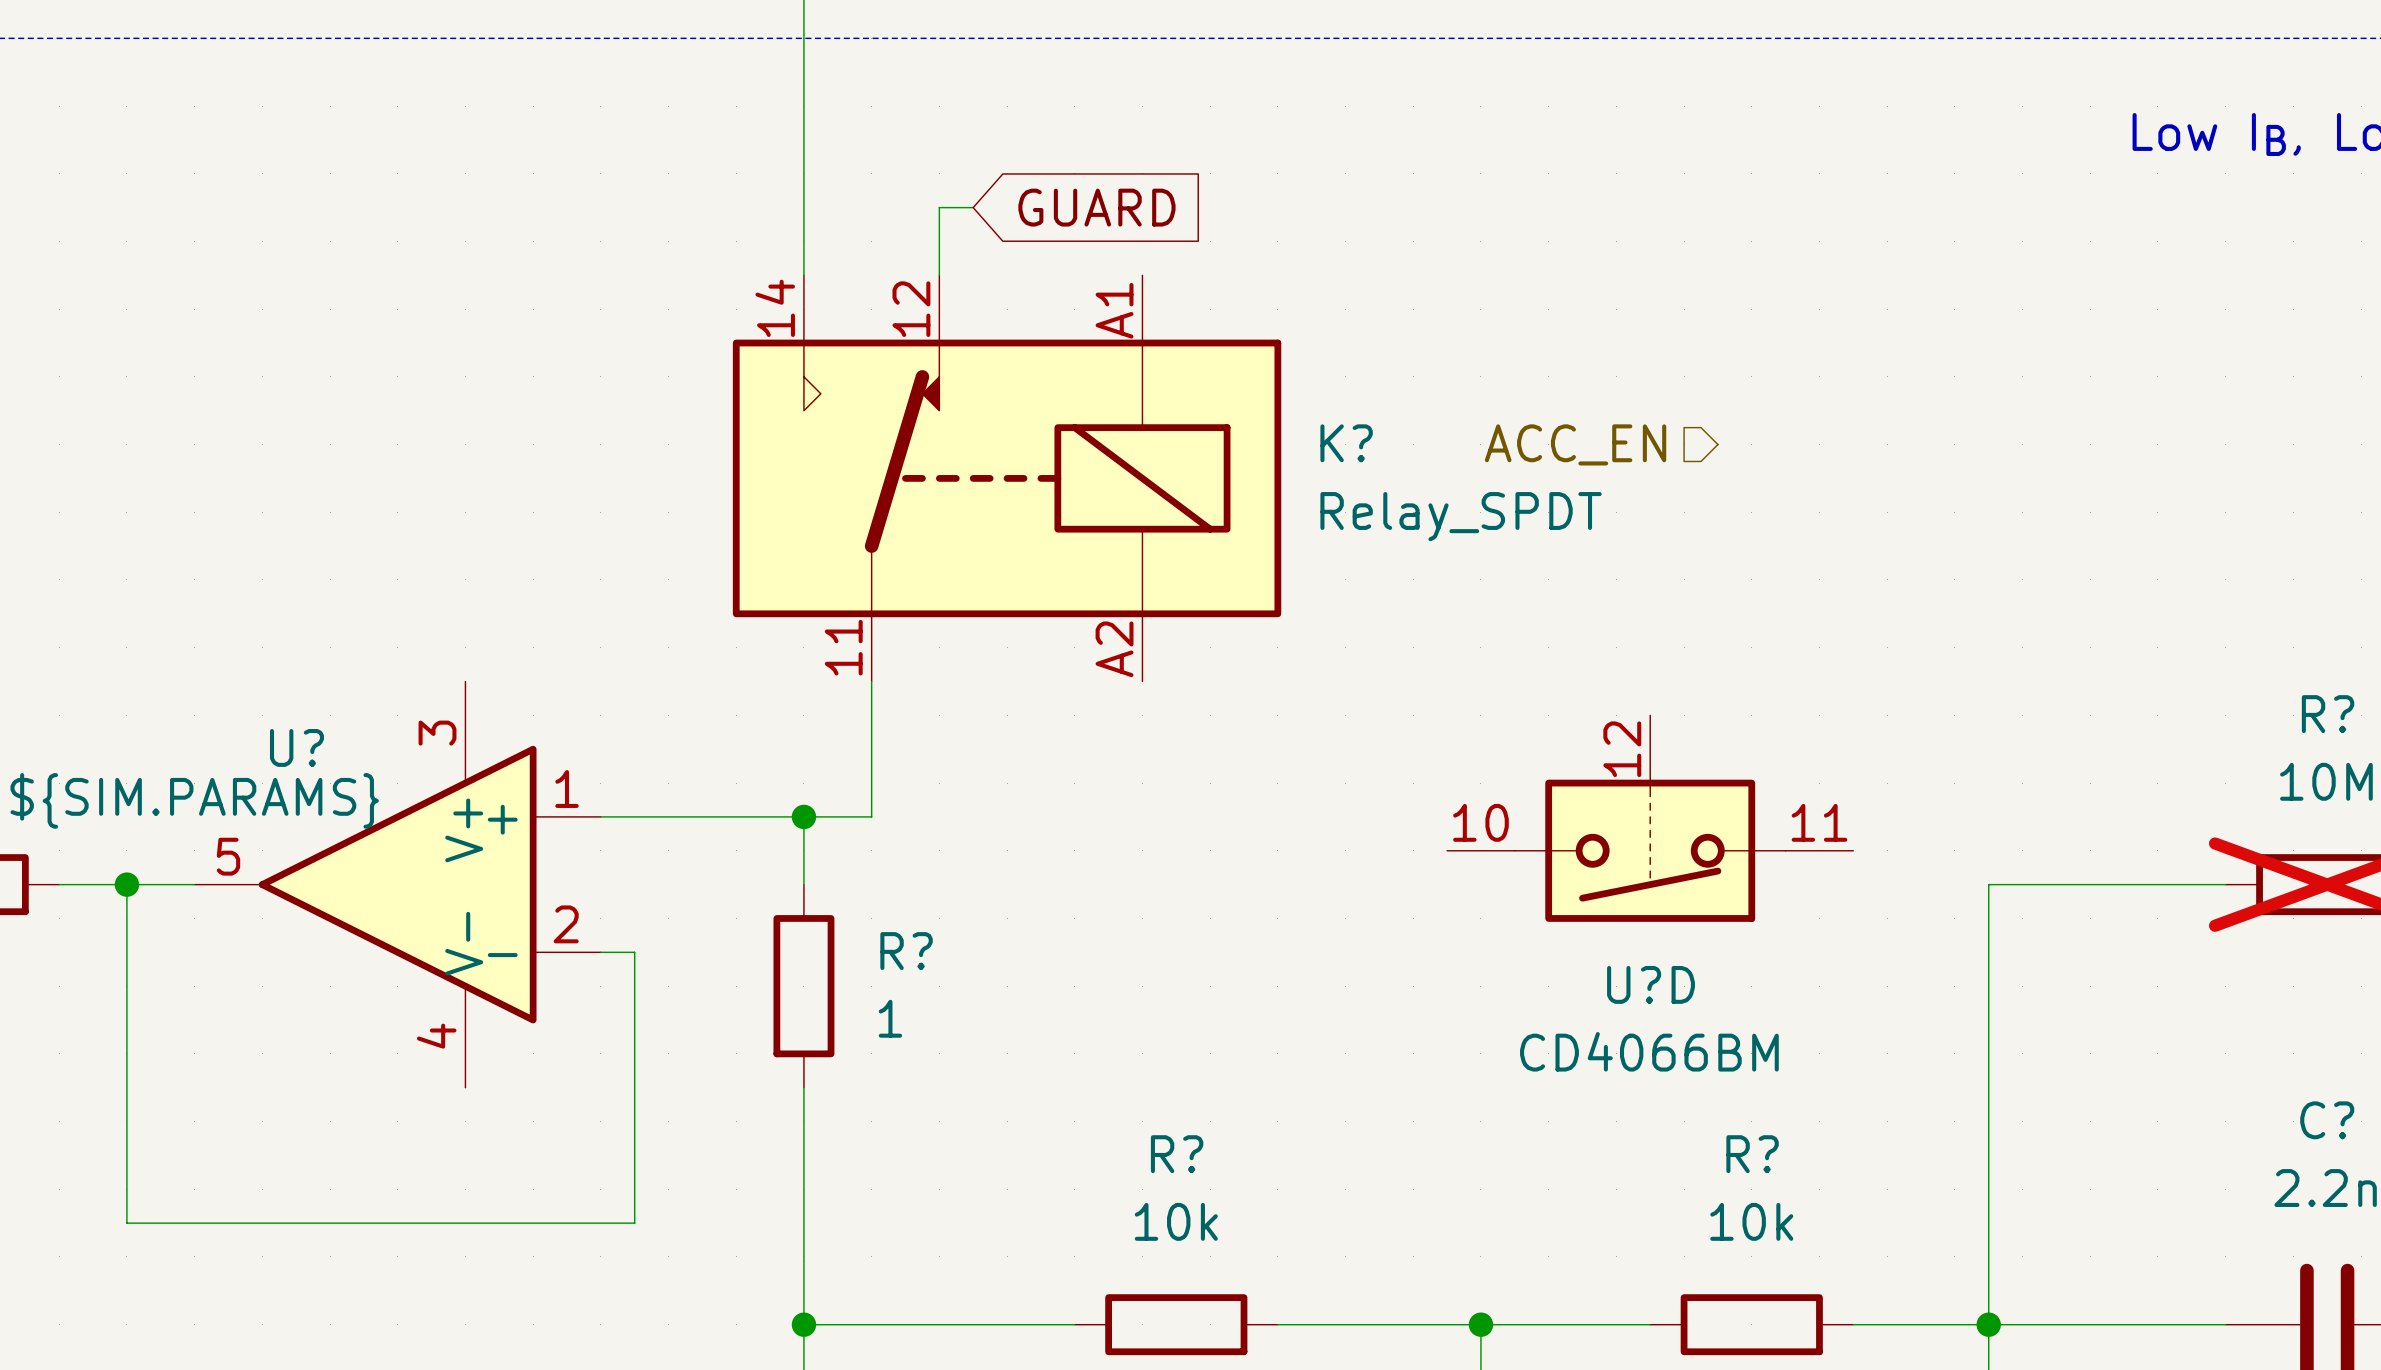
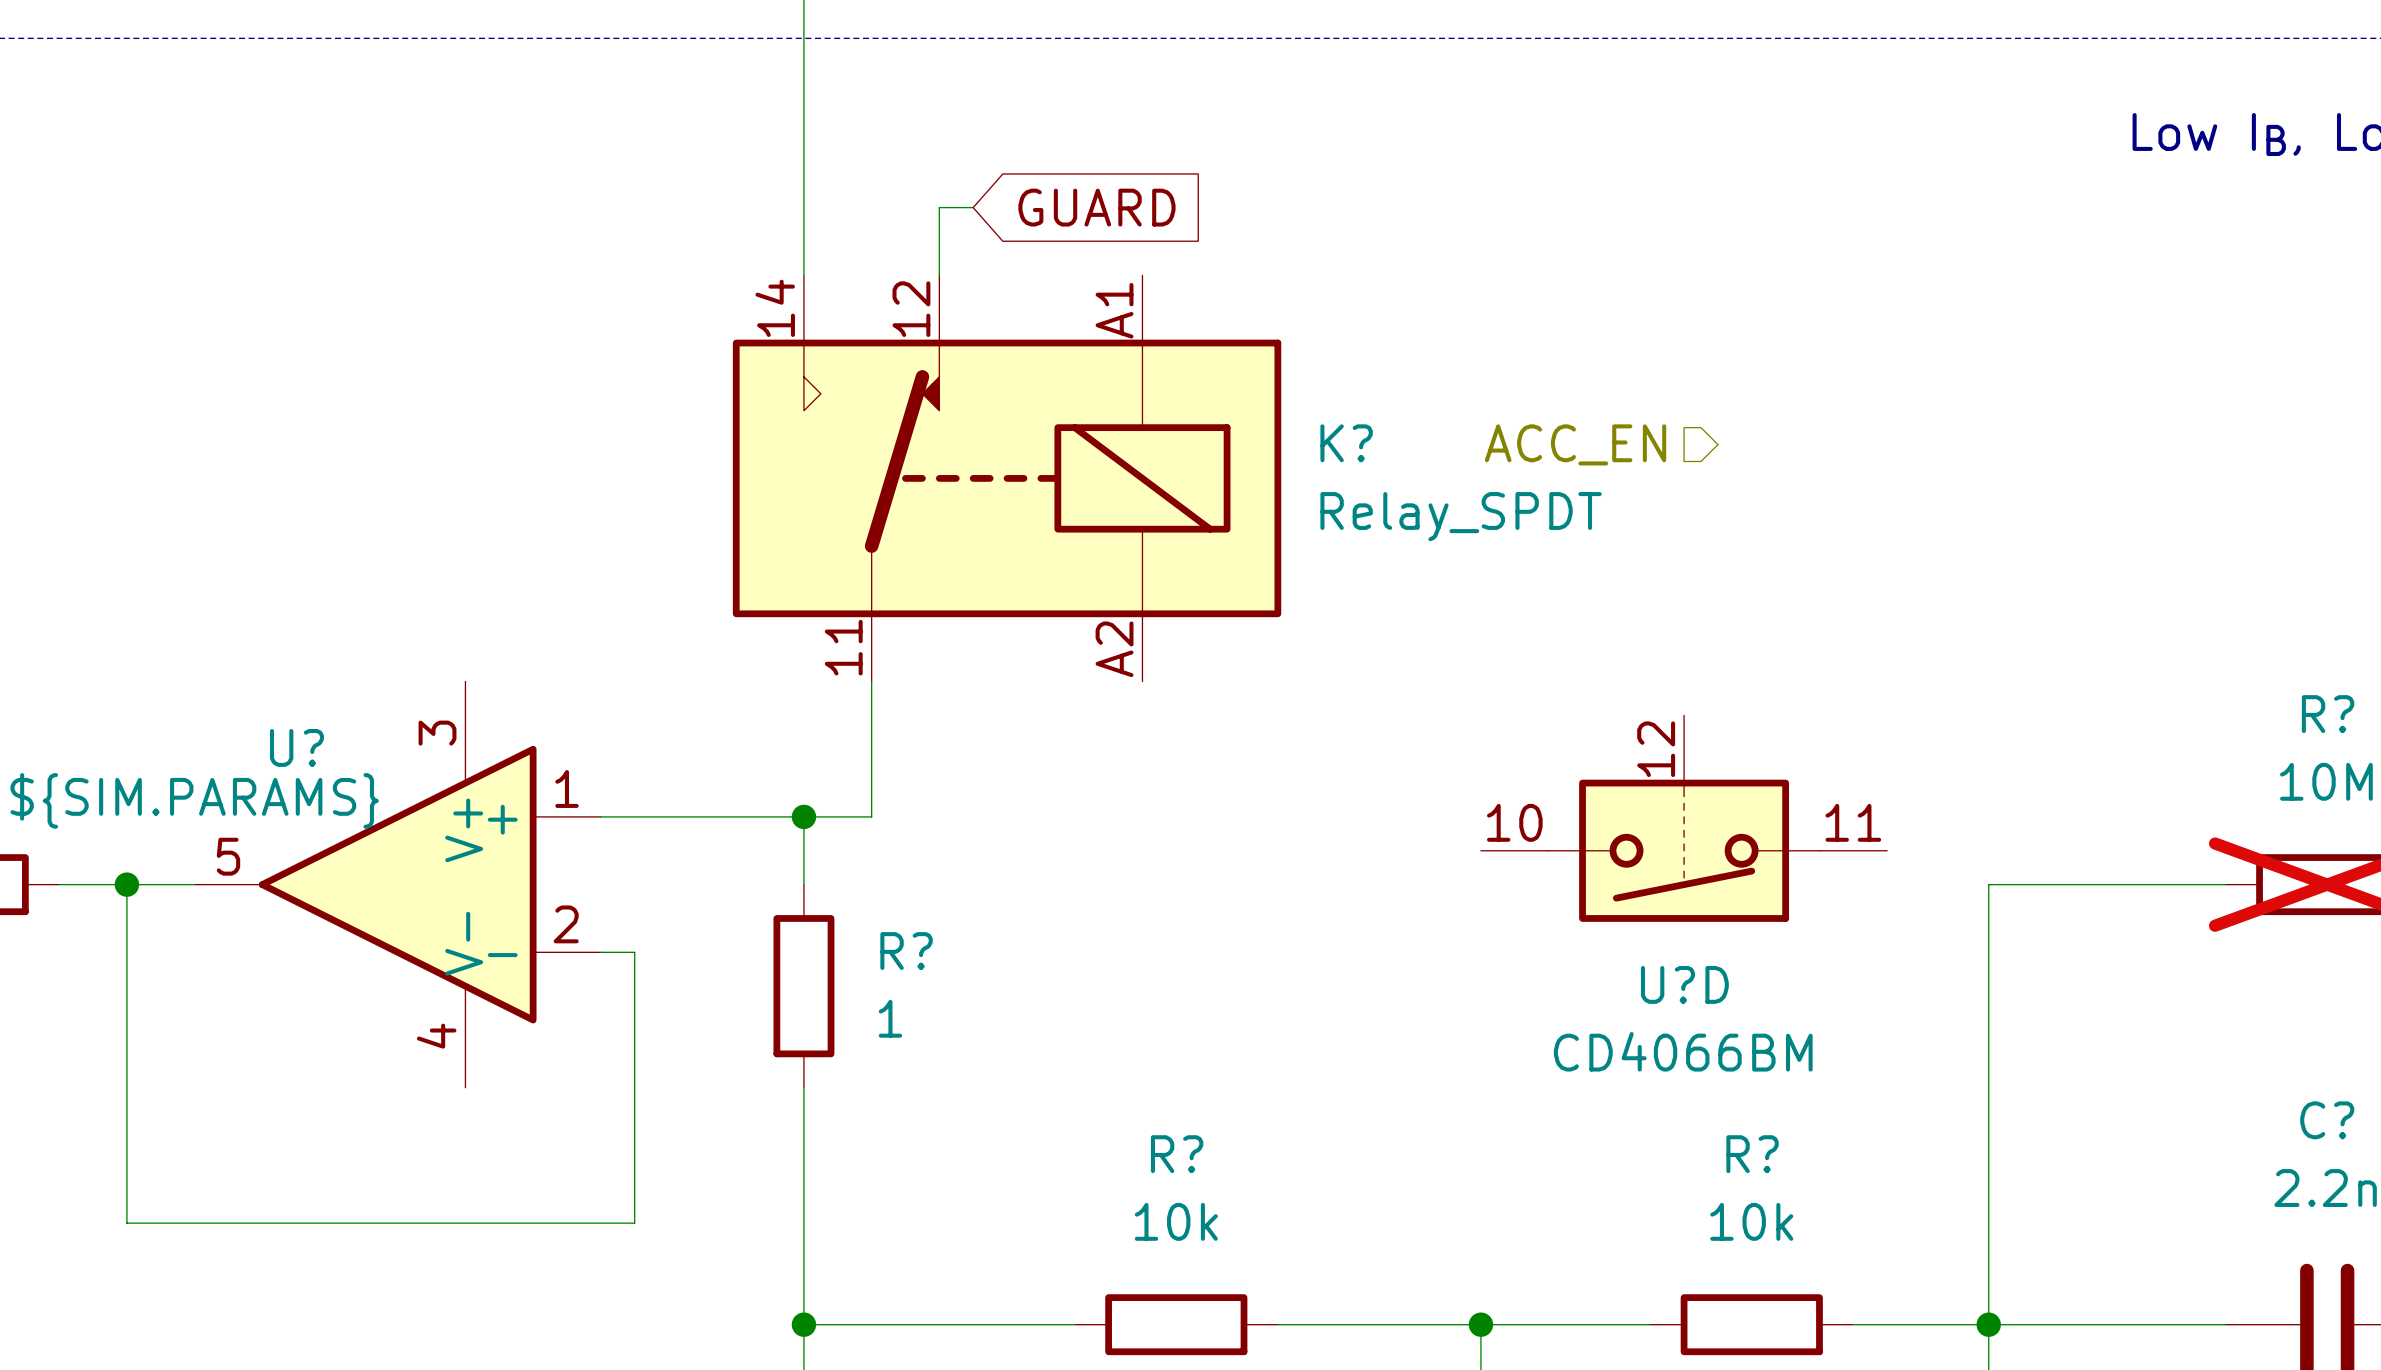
U?D position: (1650, 818) -> (1684, 818)

